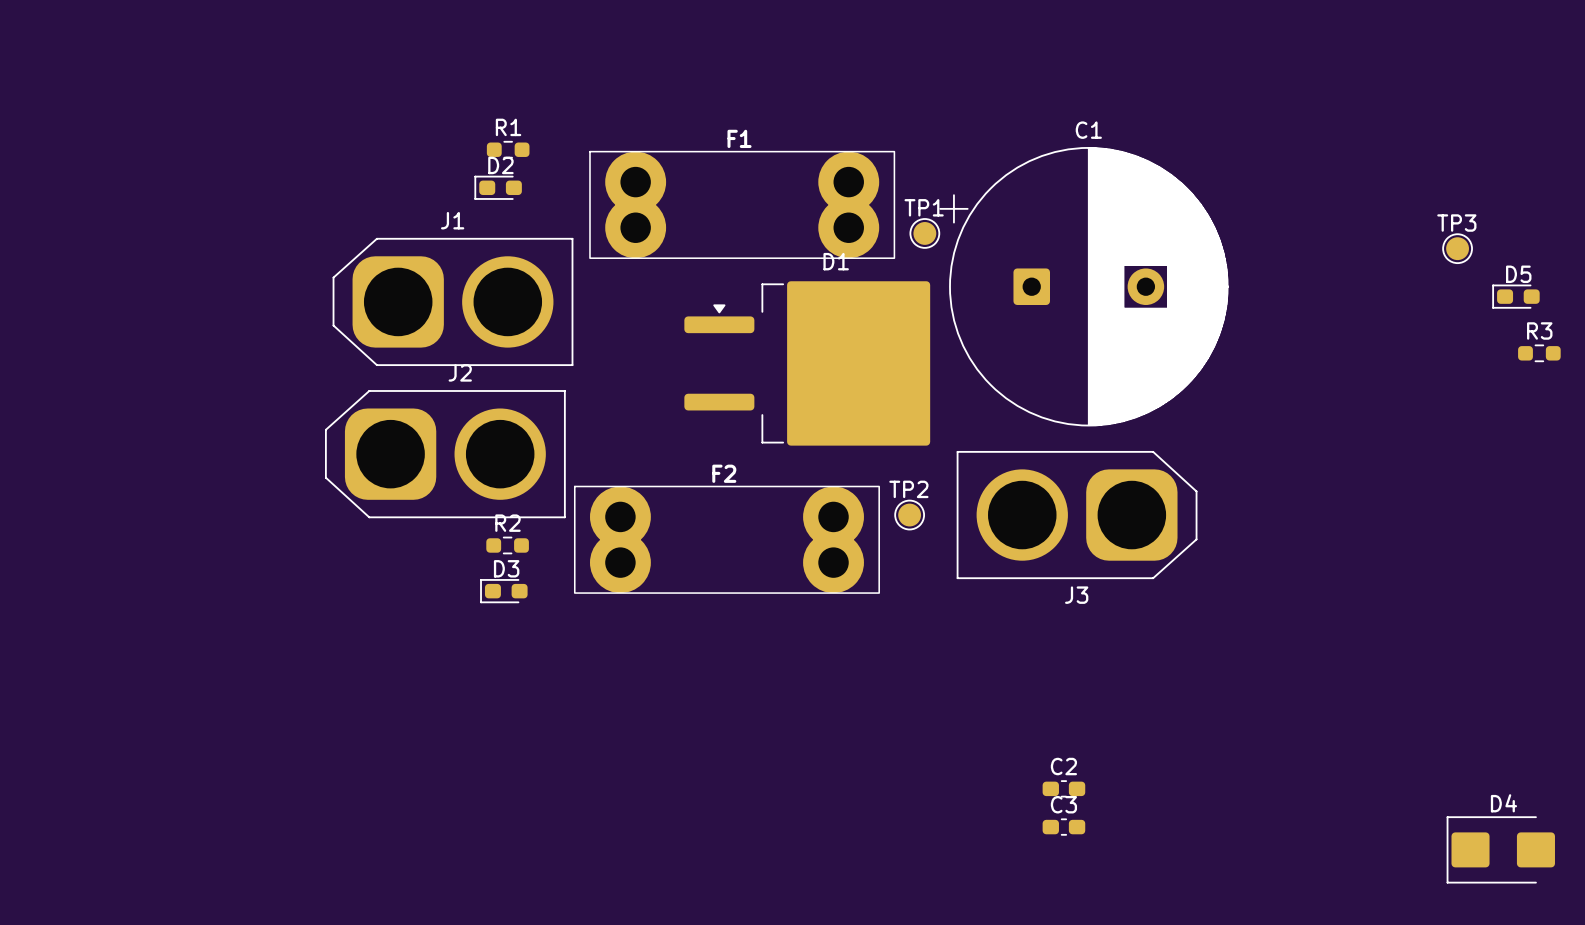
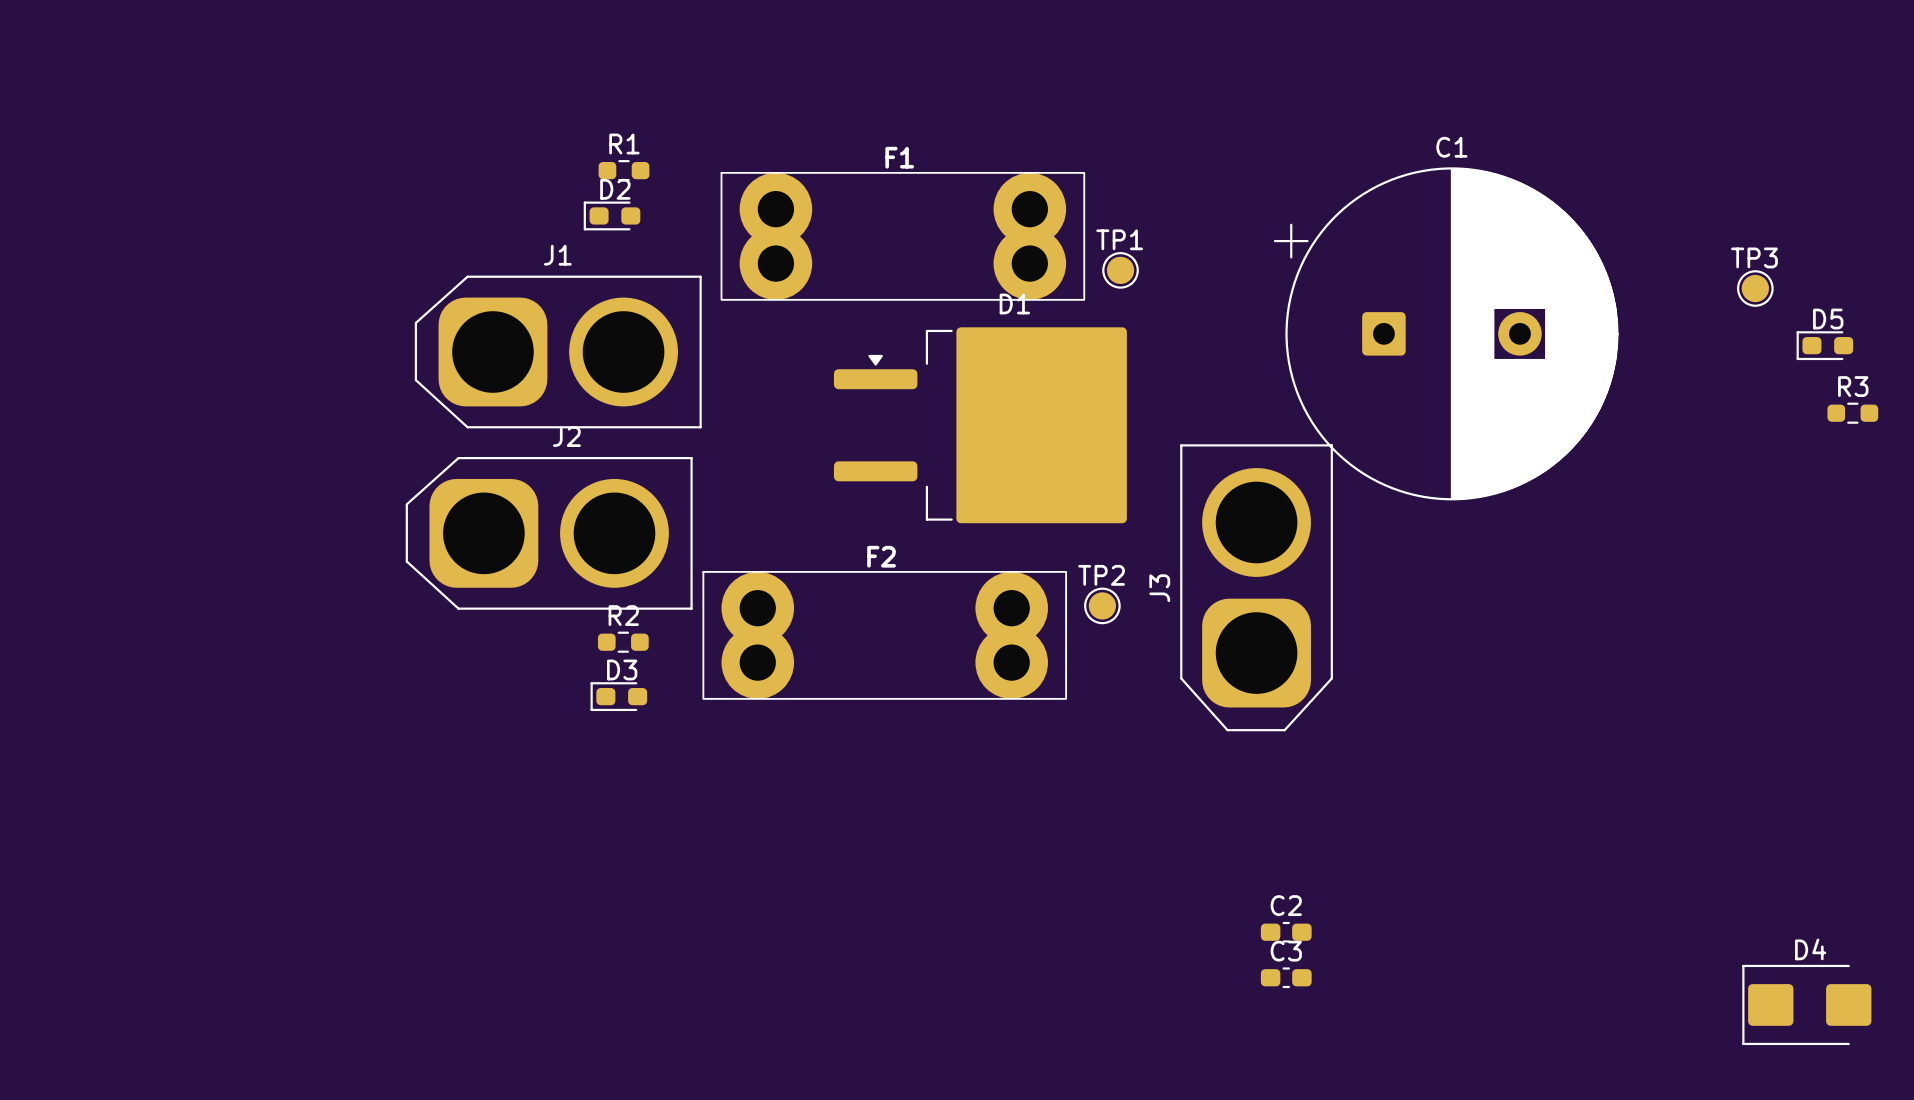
C1 position: (1083, 286) -> (1446, 333)
J3 rotation: 0° (1077, 515) -> 90° clockwise (1256, 587)

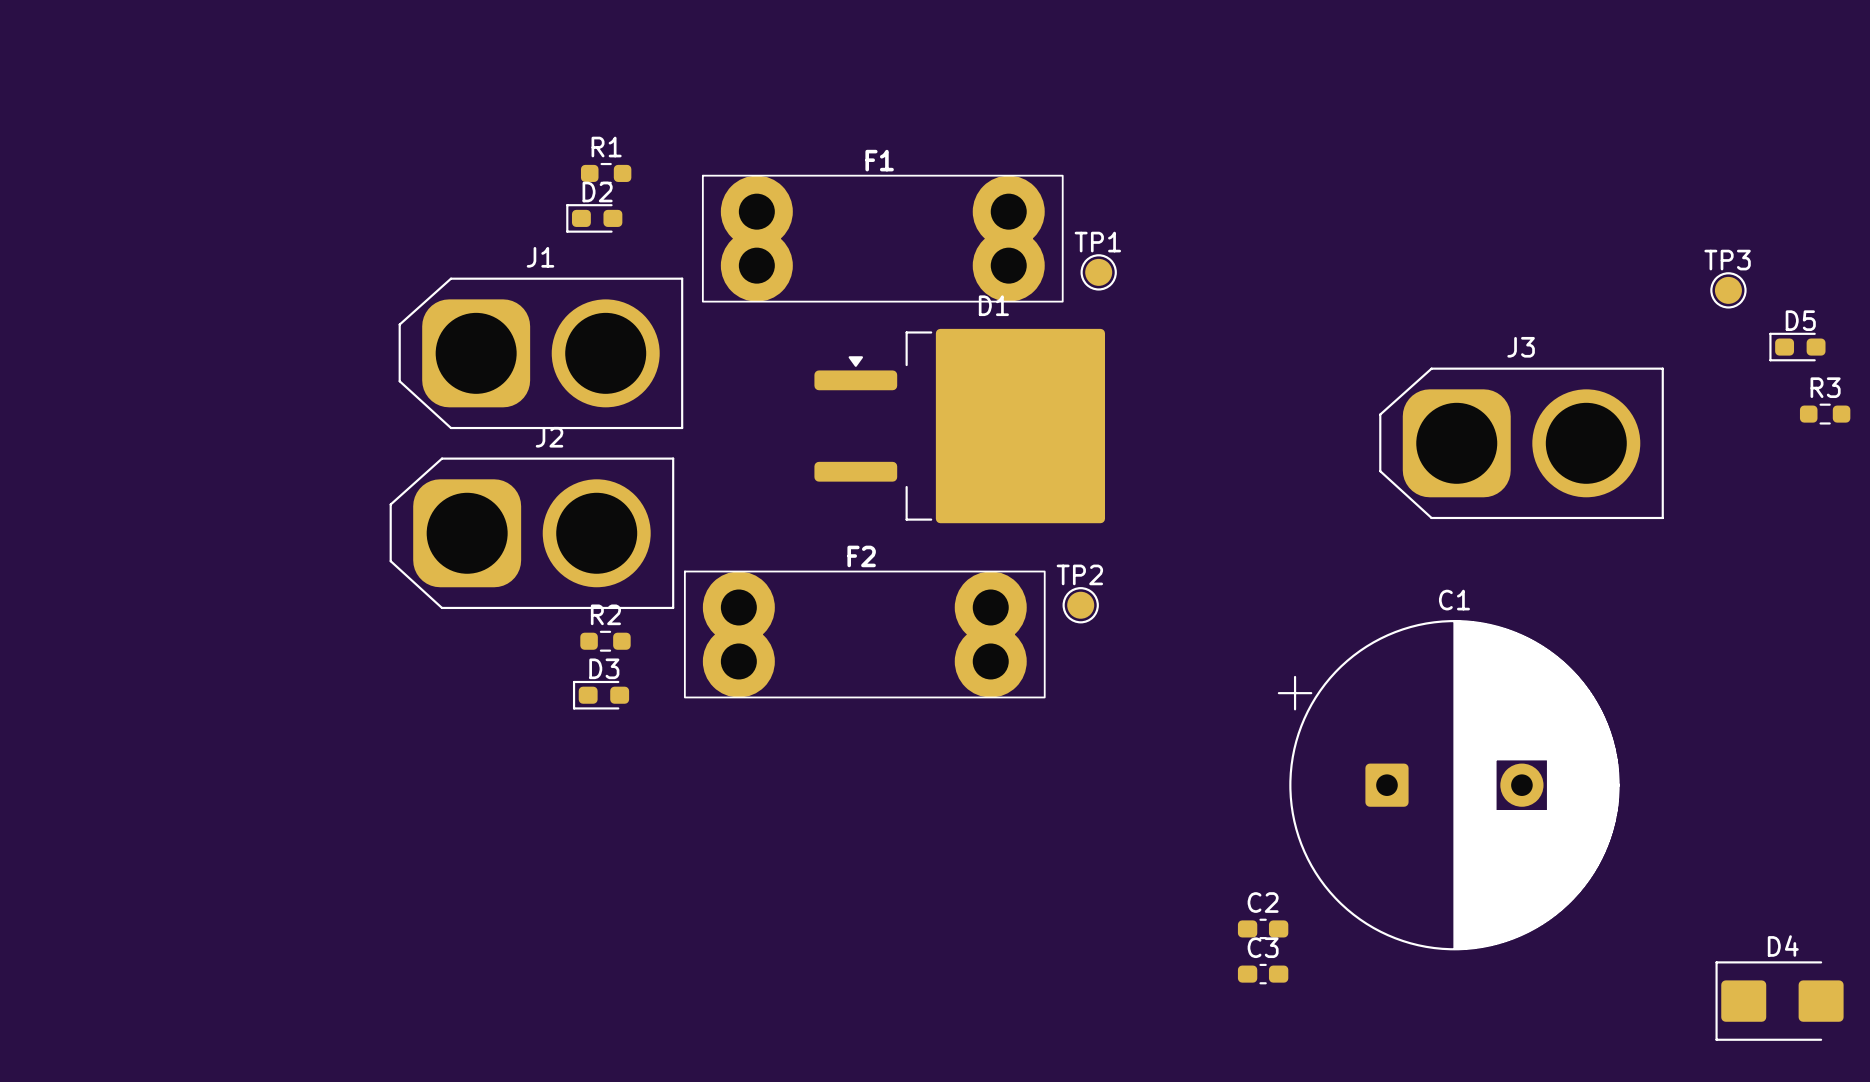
C1 position: (1446, 333) -> (1448, 785)
J3 rotation: 0° (1256, 587) -> 90° clockwise (1521, 443)
J3 position: (1256, 587) -> (1521, 443)

